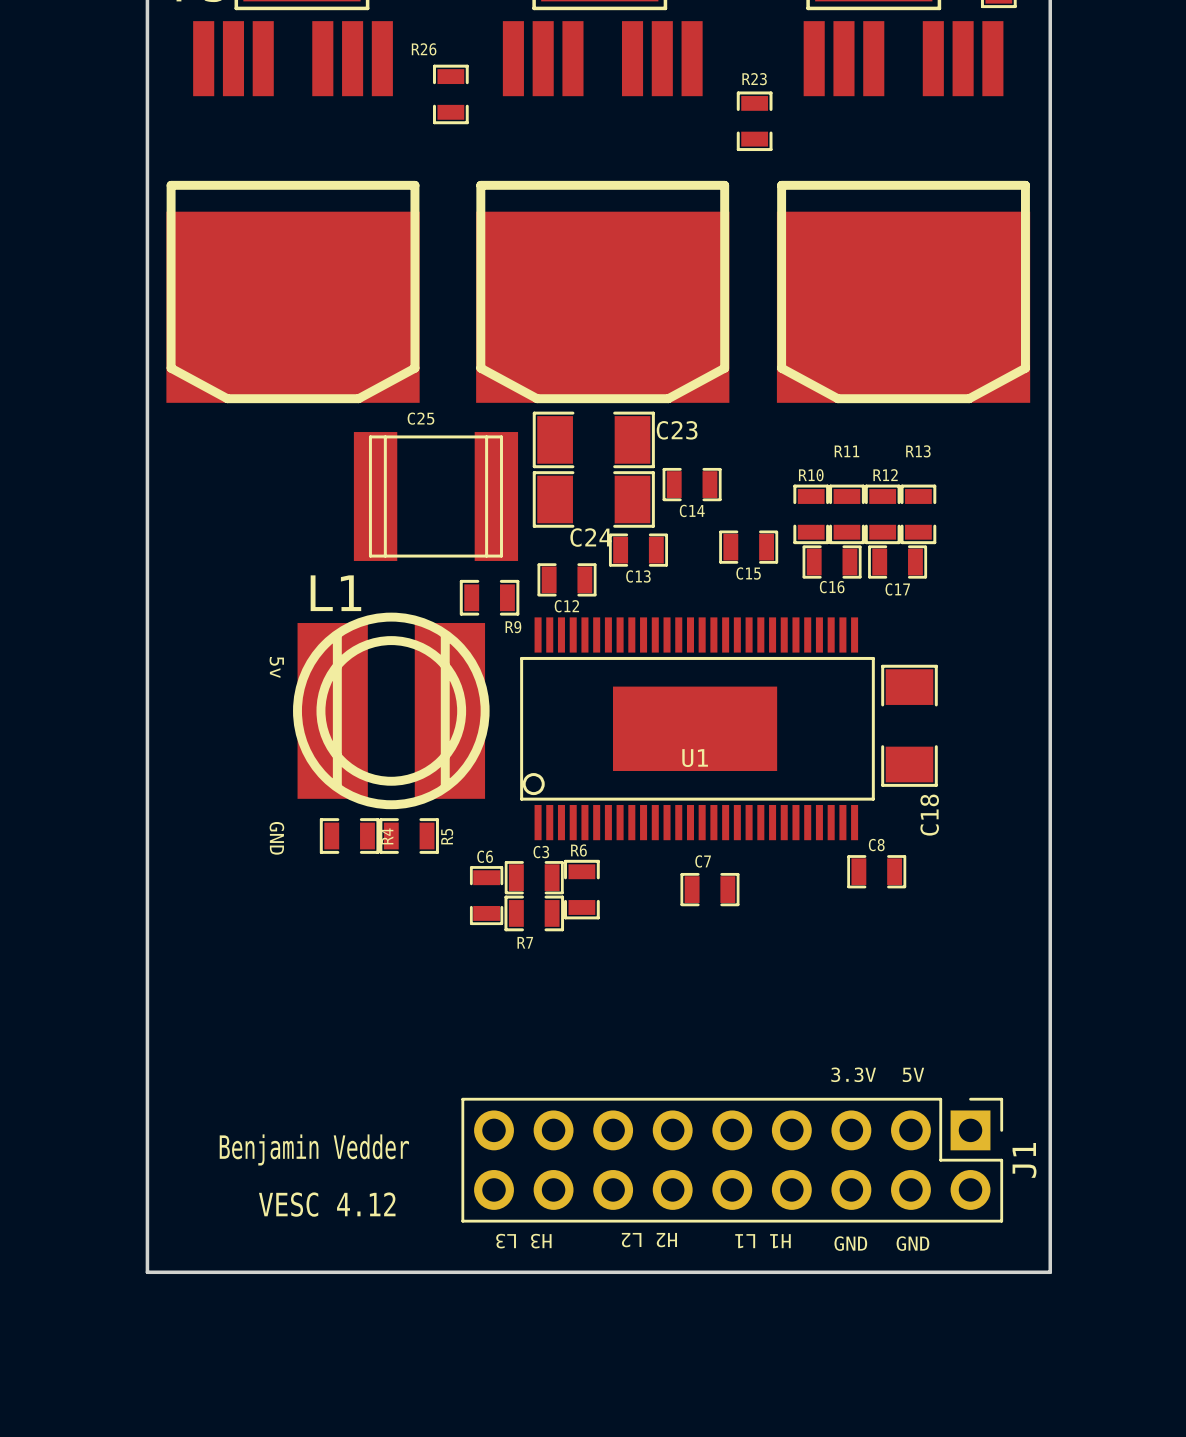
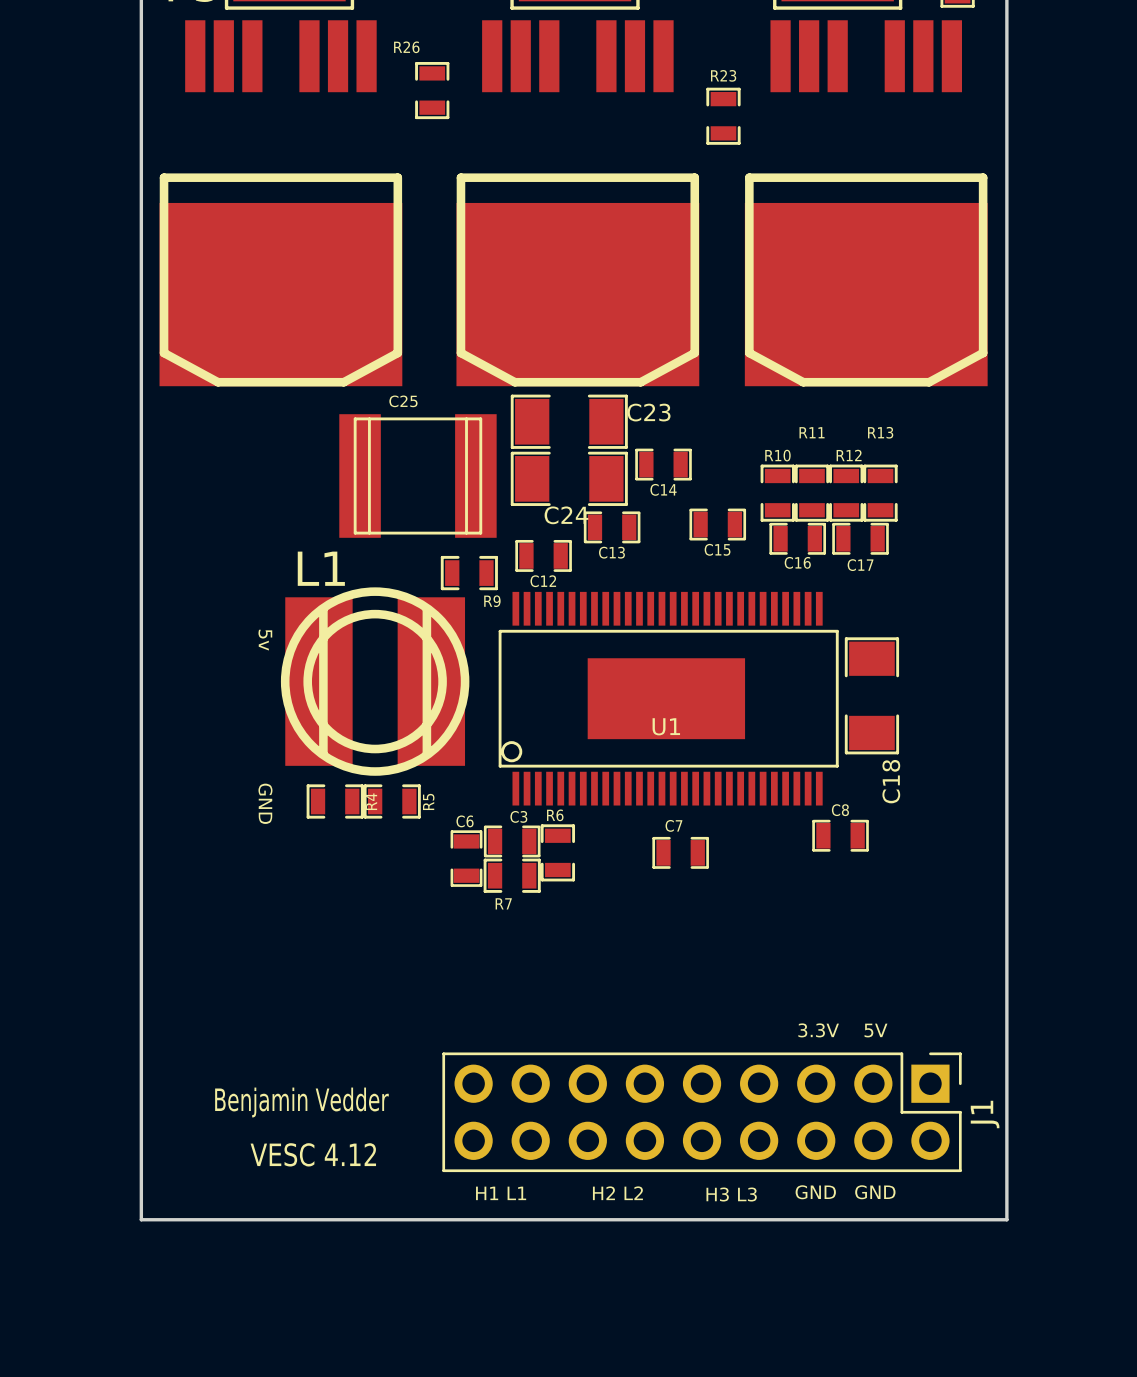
text rotation: 0° (649, 1240) -> 180° (617, 1193)
text: H3 L3 (523, 1241) -> H1 L1 (501, 1193)
text: H1 L1 (762, 1241) -> H3 L3 (731, 1194)

